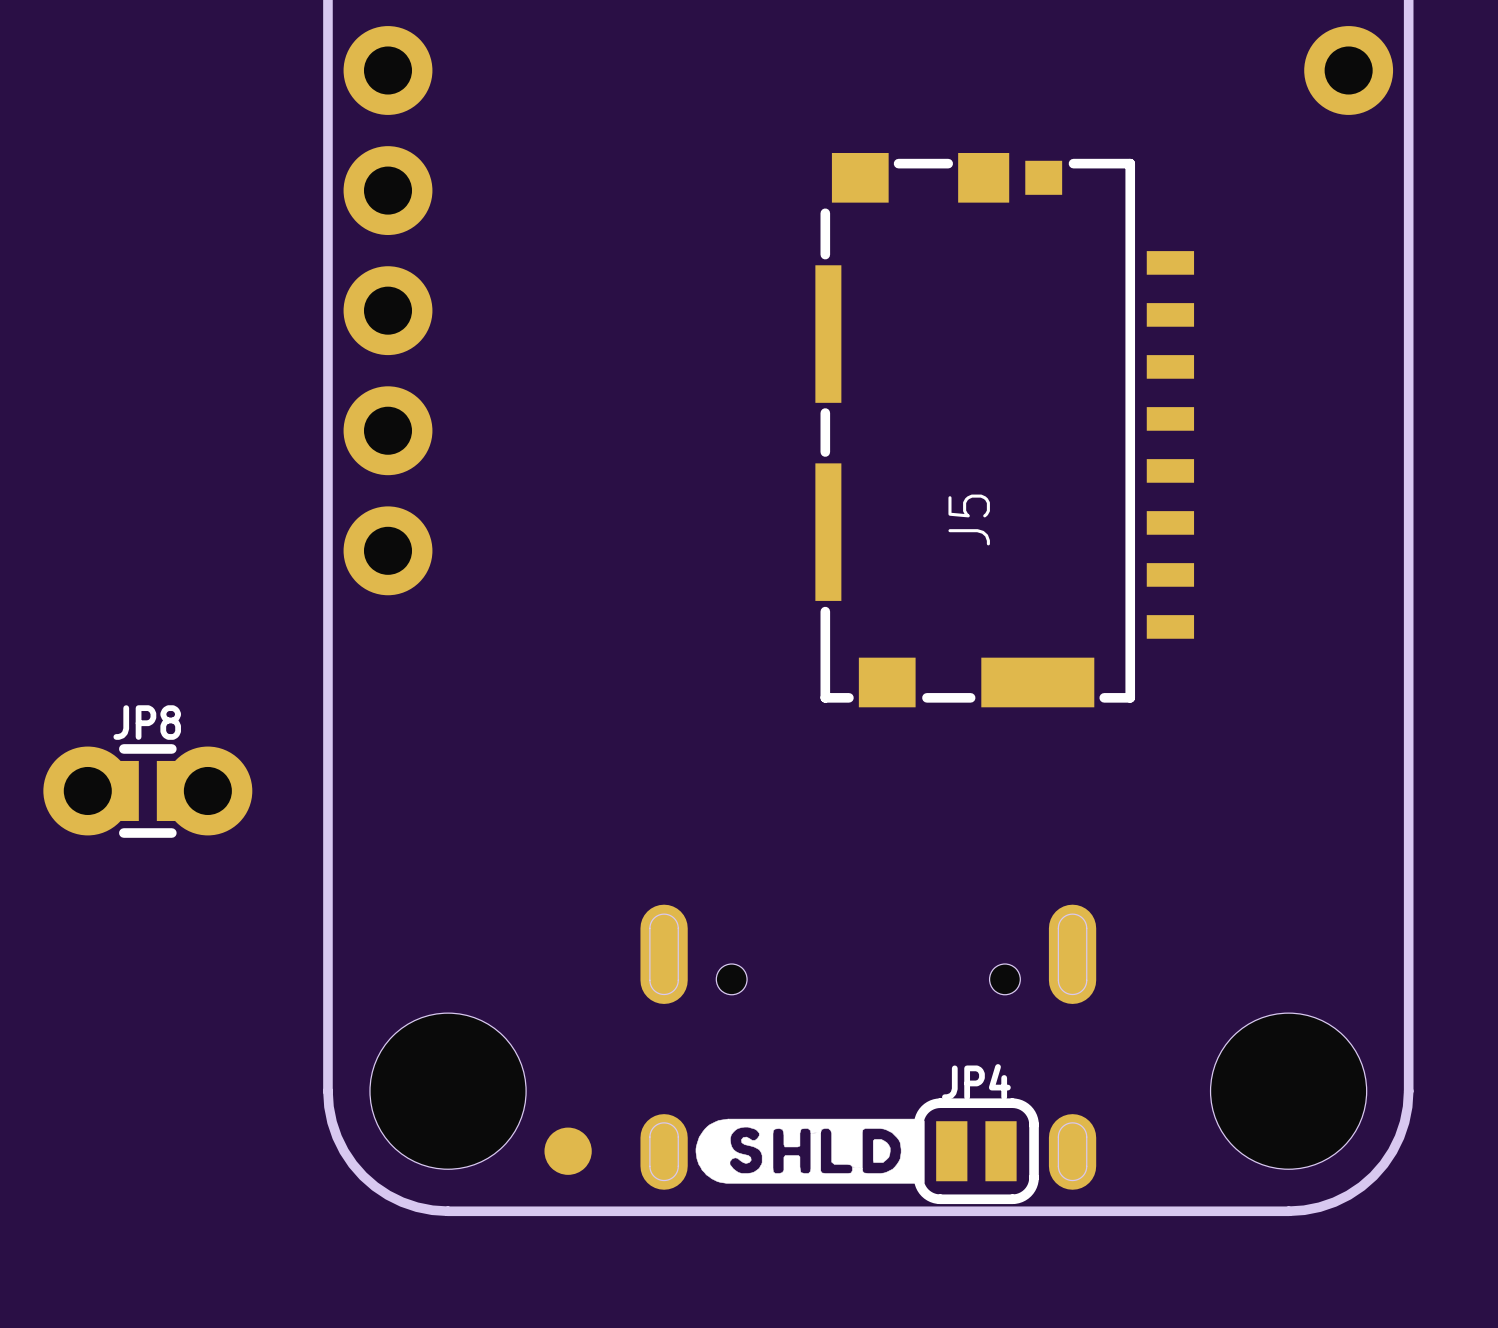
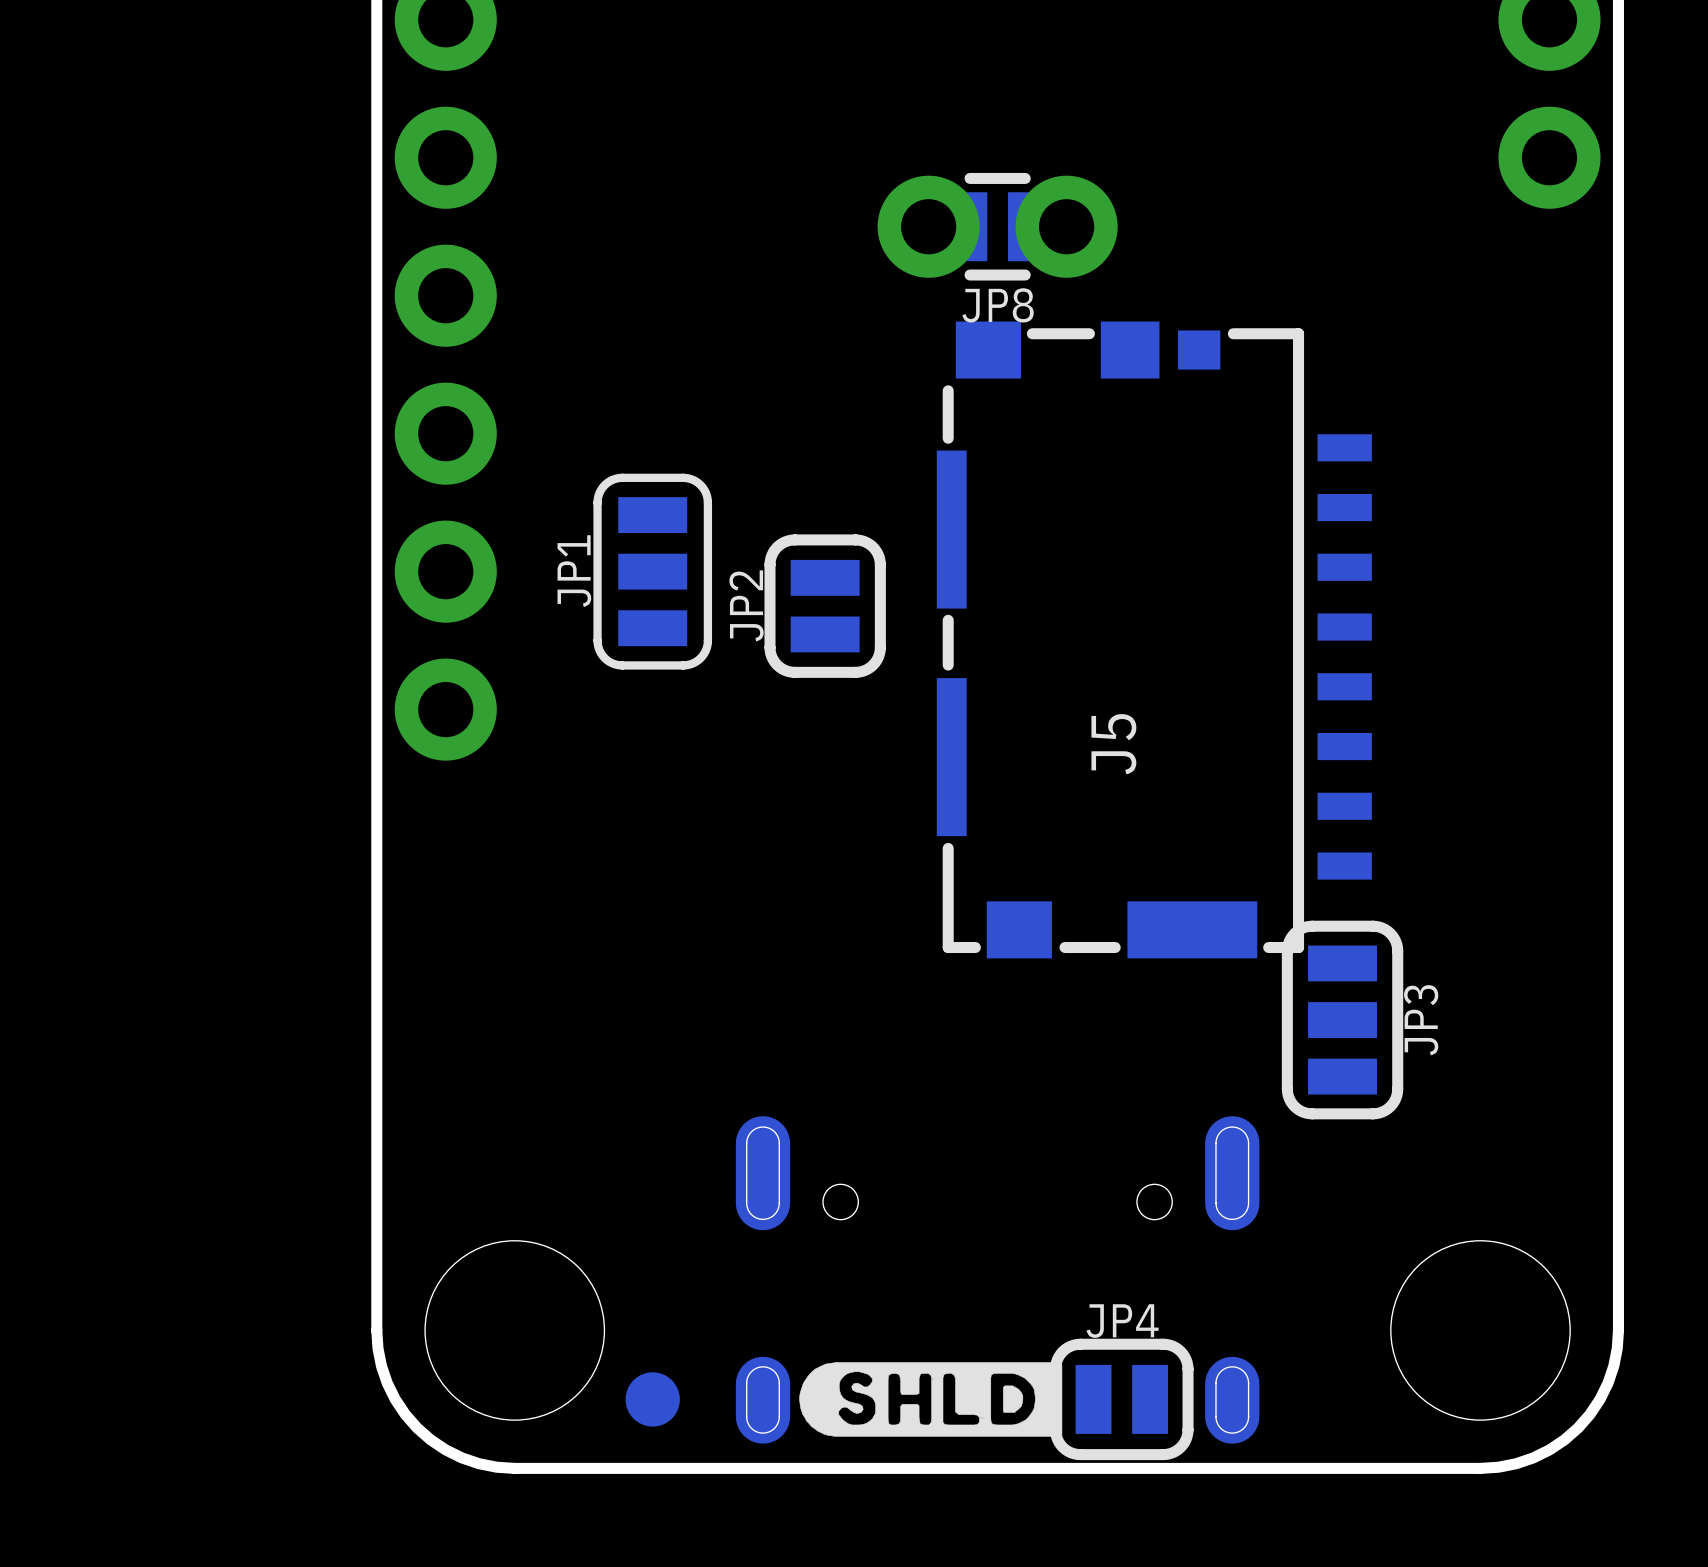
JP1: none -> (652, 571)
J5 position: (1004, 430) -> (1154, 639)
JP2: none -> (825, 606)
JP8 name position: JP8 (147, 722) -> JP8 (998, 305)
JP8 position: (147, 790) -> (997, 226)
JP3: none -> (1342, 1020)

